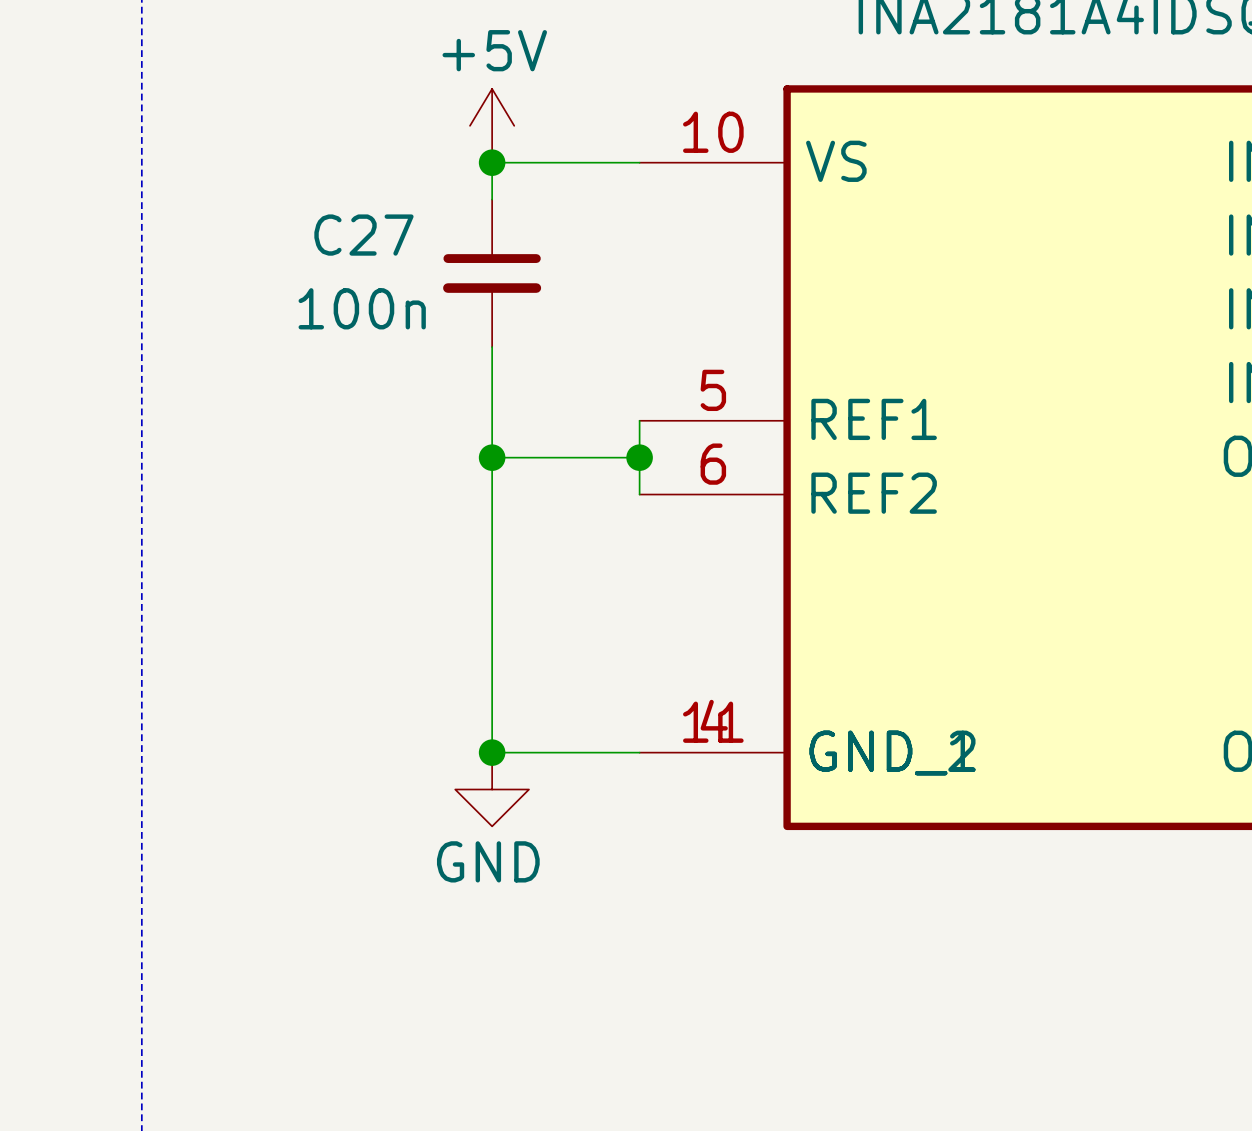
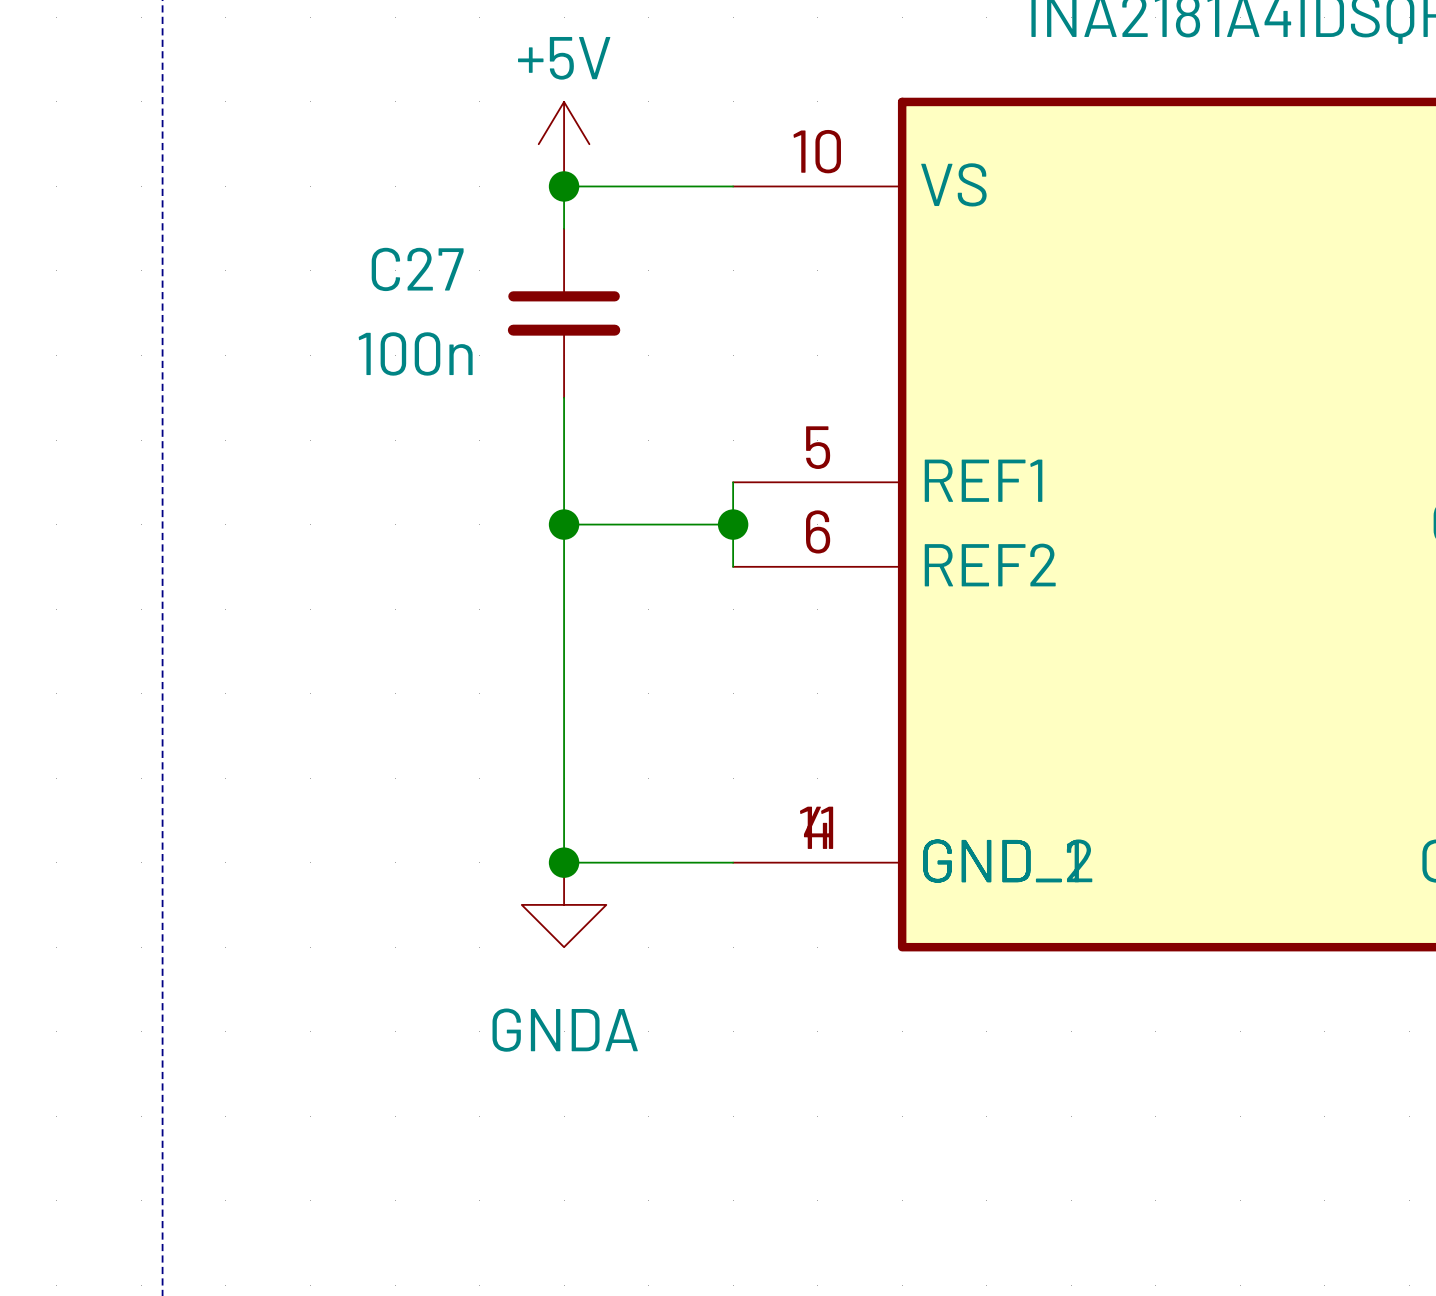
power symbol: GND (492, 789) -> GNDA (564, 904)

